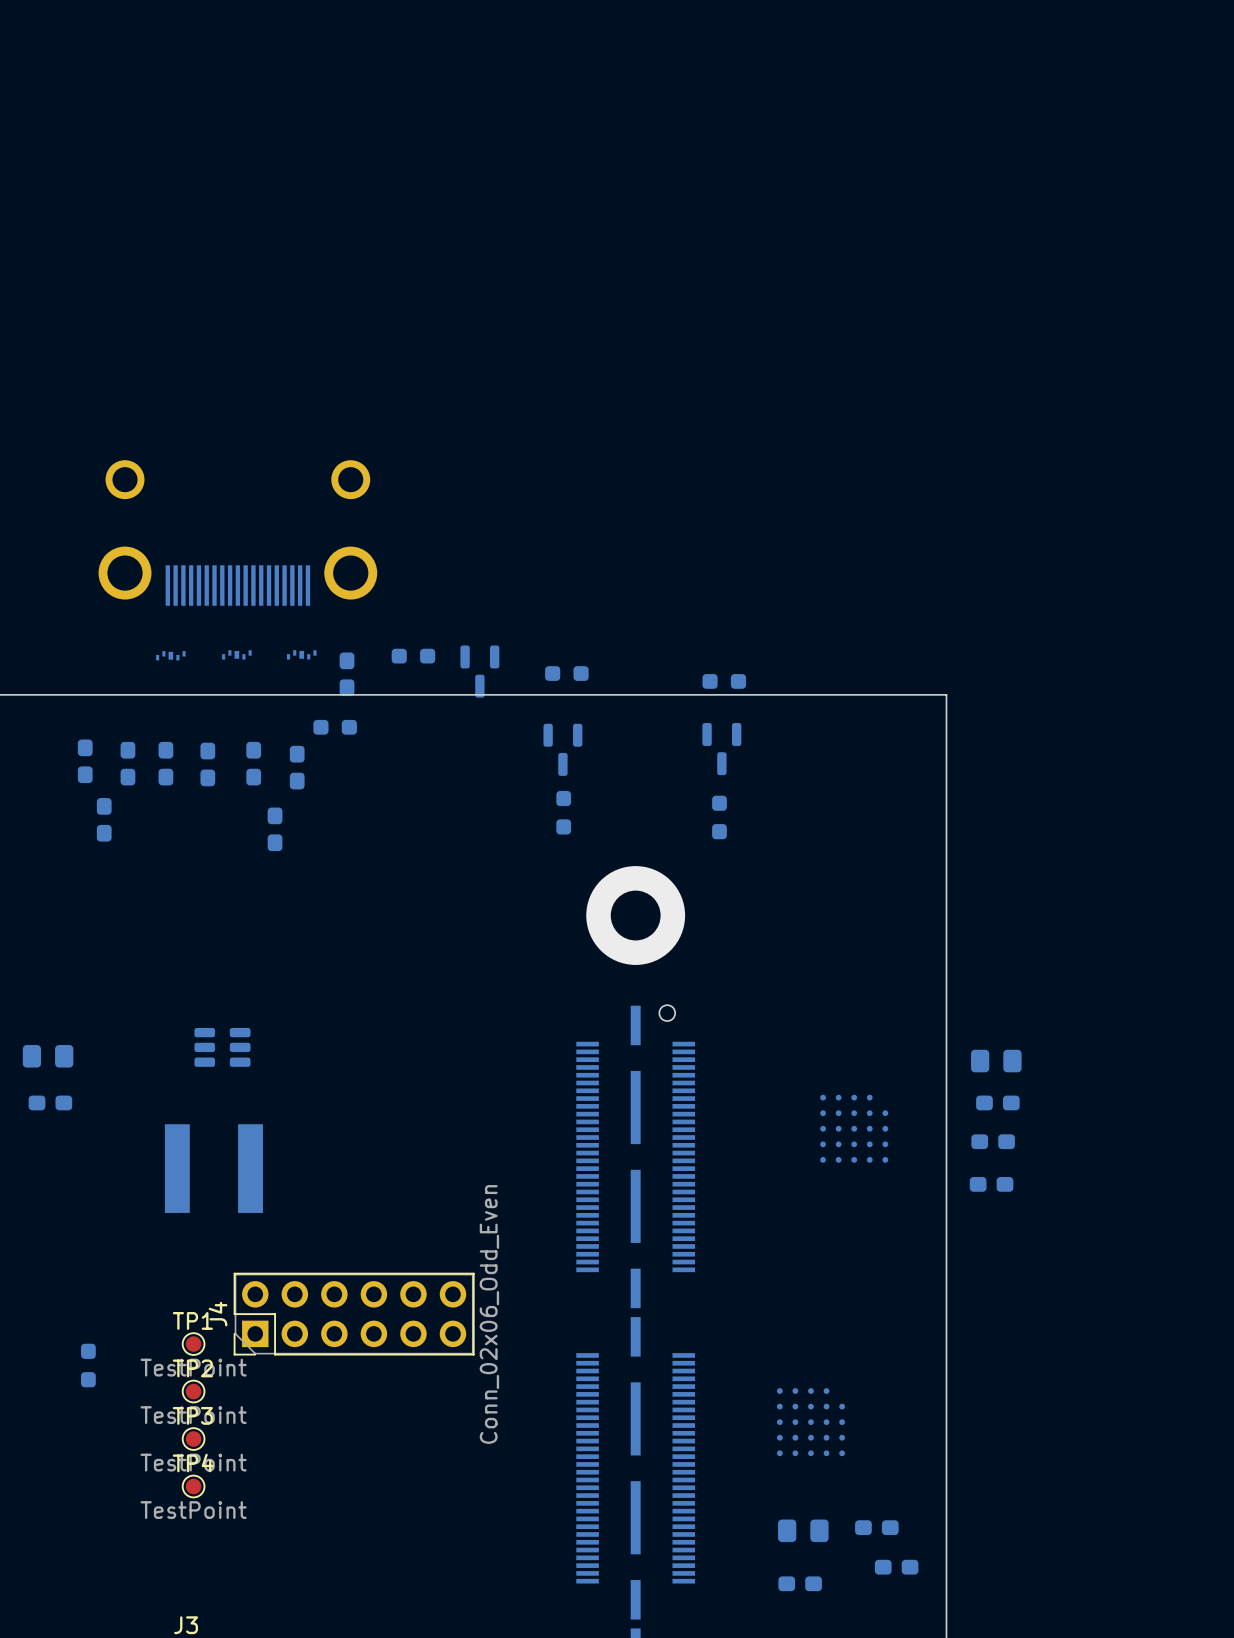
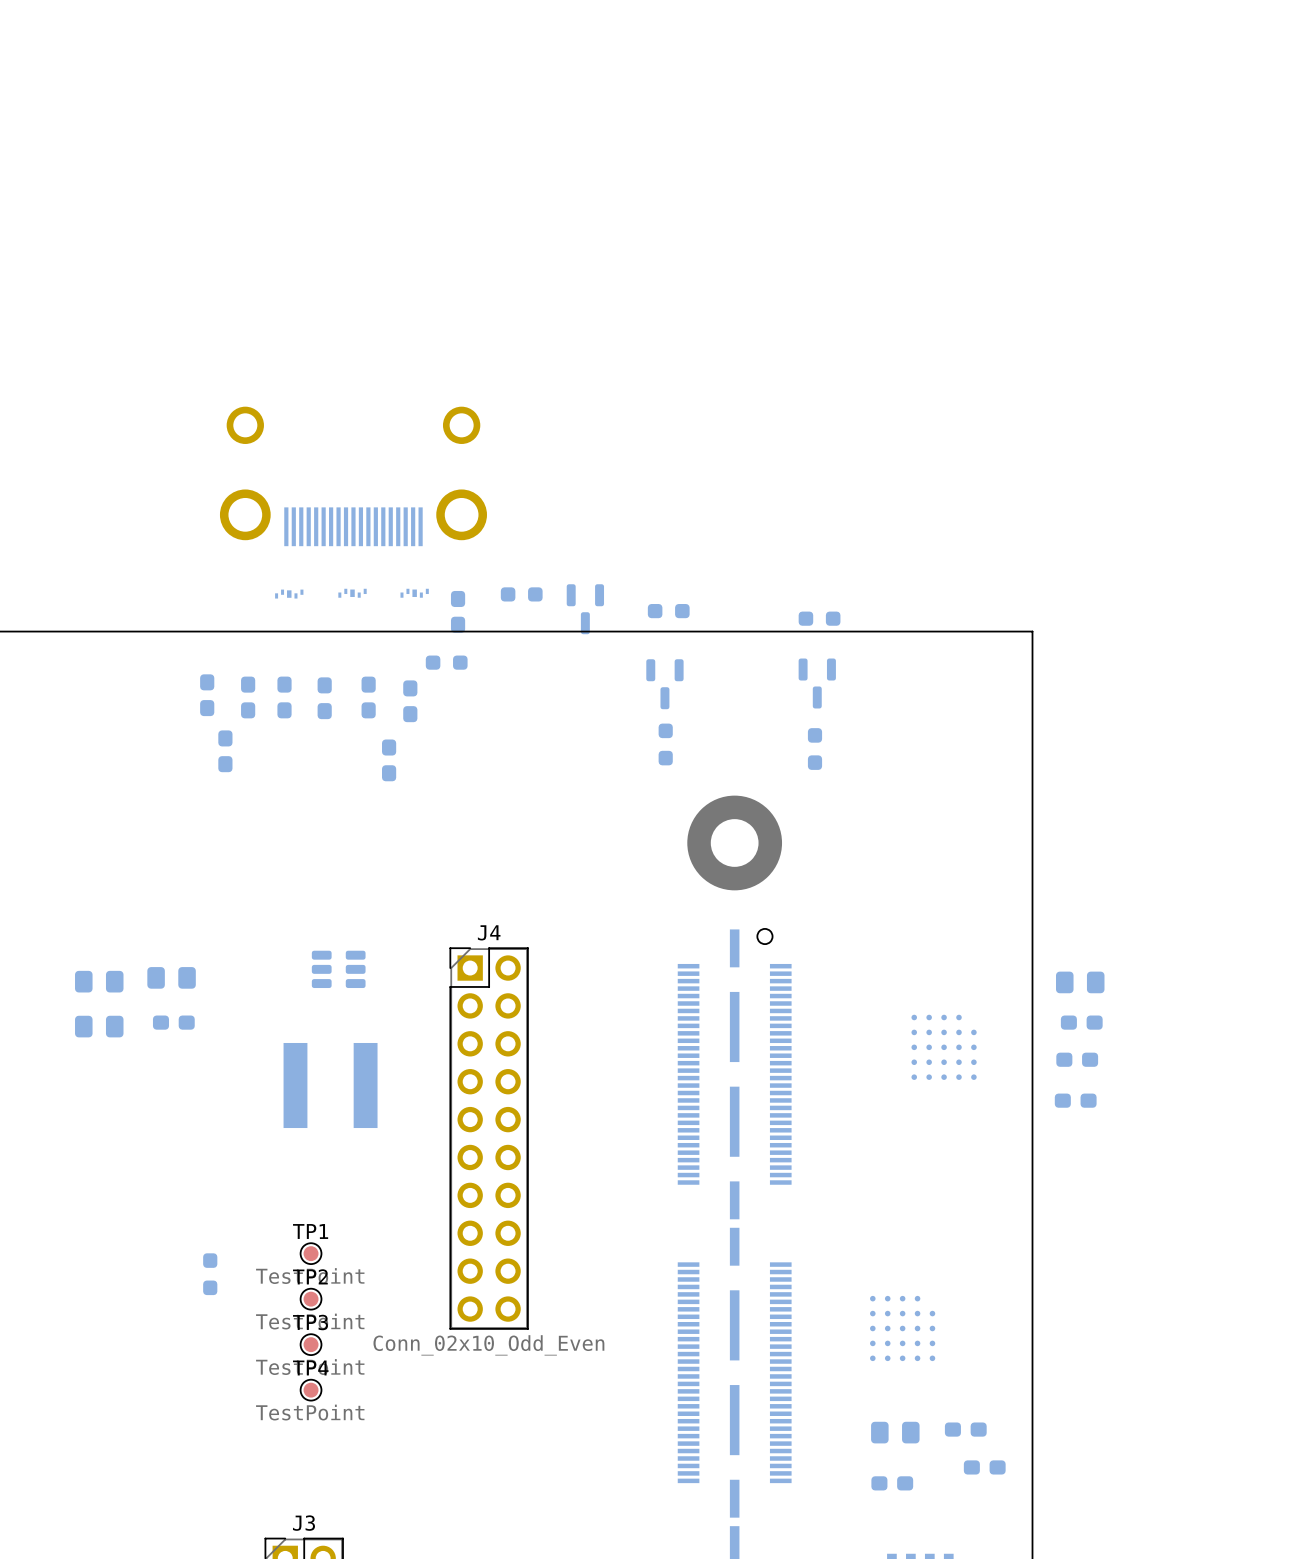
J4 footprint: [233, 1272, 475, 1356] -> [449, 947, 529, 1330]
J4 name position: J4 (218, 1314) -> J4 (489, 932)
J4 value: Conn_02x06_Odd_Even (489, 1314) -> Conn_02x10_Odd_Even (488, 1345)

